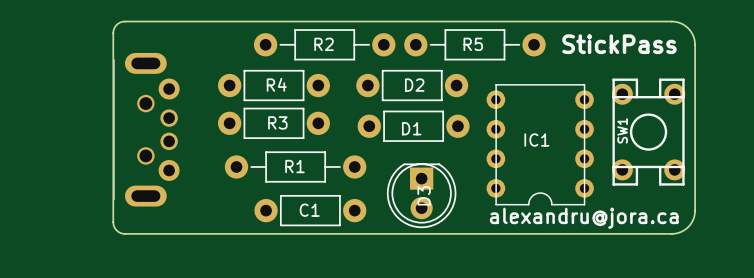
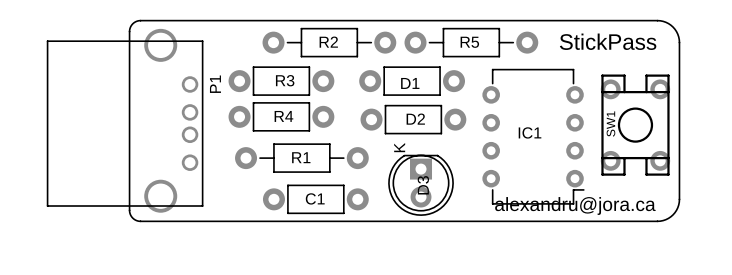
R4 name: R4 (276, 84) -> R3 (285, 80)
IC1 footprint: [486, 84, 594, 206] -> [482, 68, 585, 205]
D2 name: D2 (414, 85) -> D1 (410, 83)
R3 name: R3 (277, 122) -> R4 (283, 116)
P1: none -> (125, 120)
D1 name: D1 (411, 128) -> D2 (415, 119)
part: (146, 129) -> none
D3 text: none -> K (399, 147)

